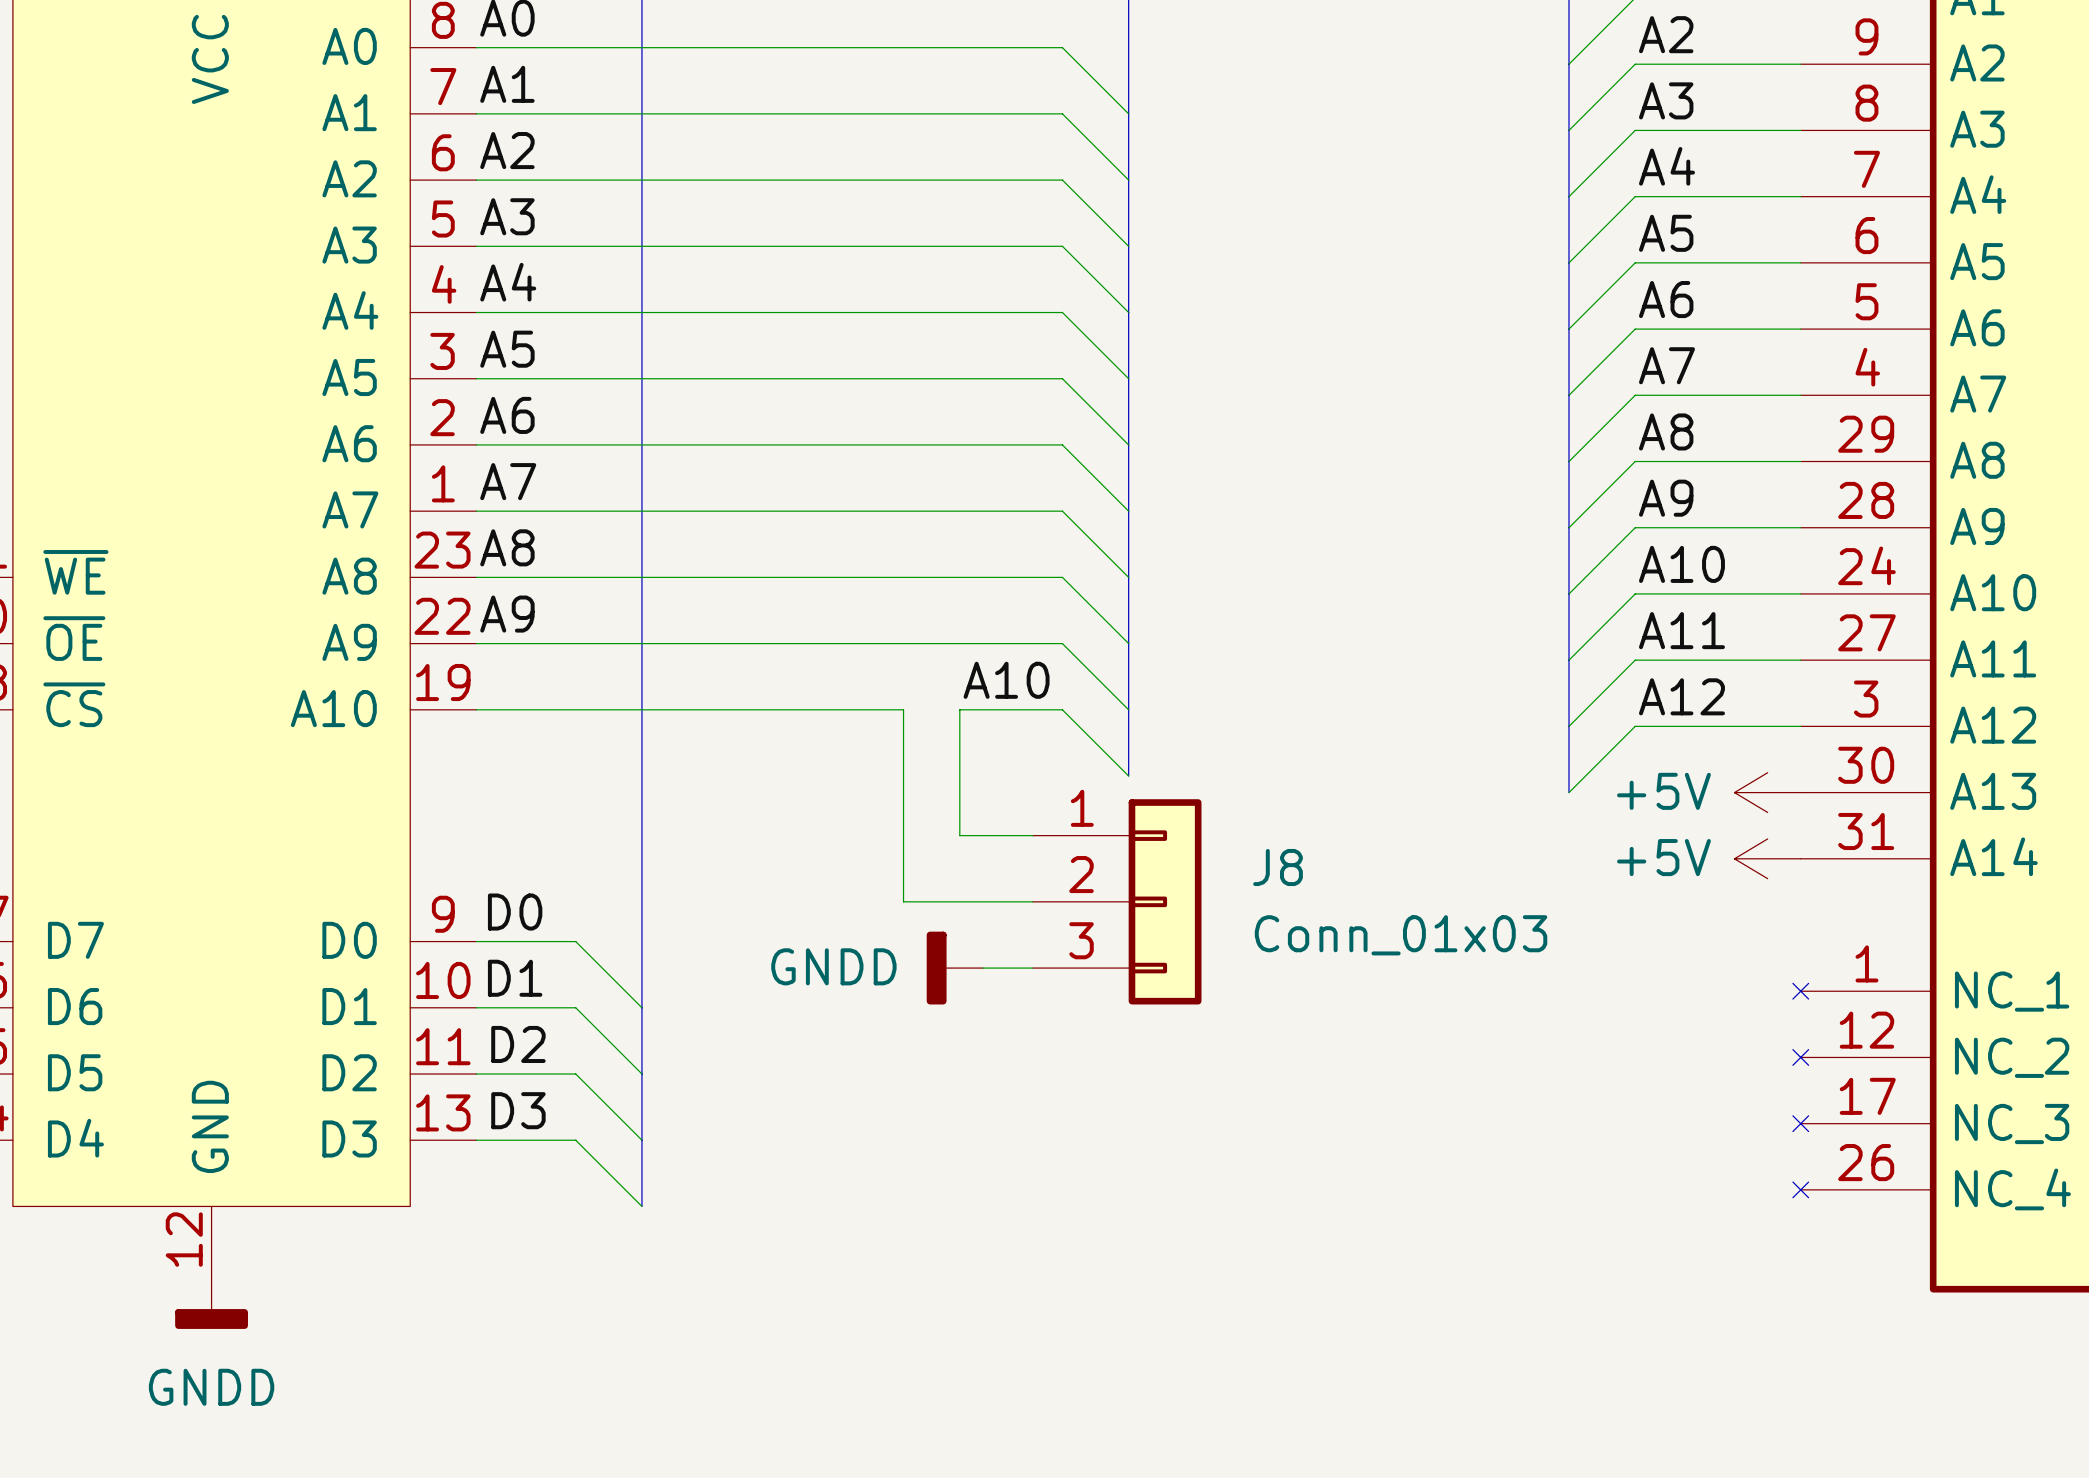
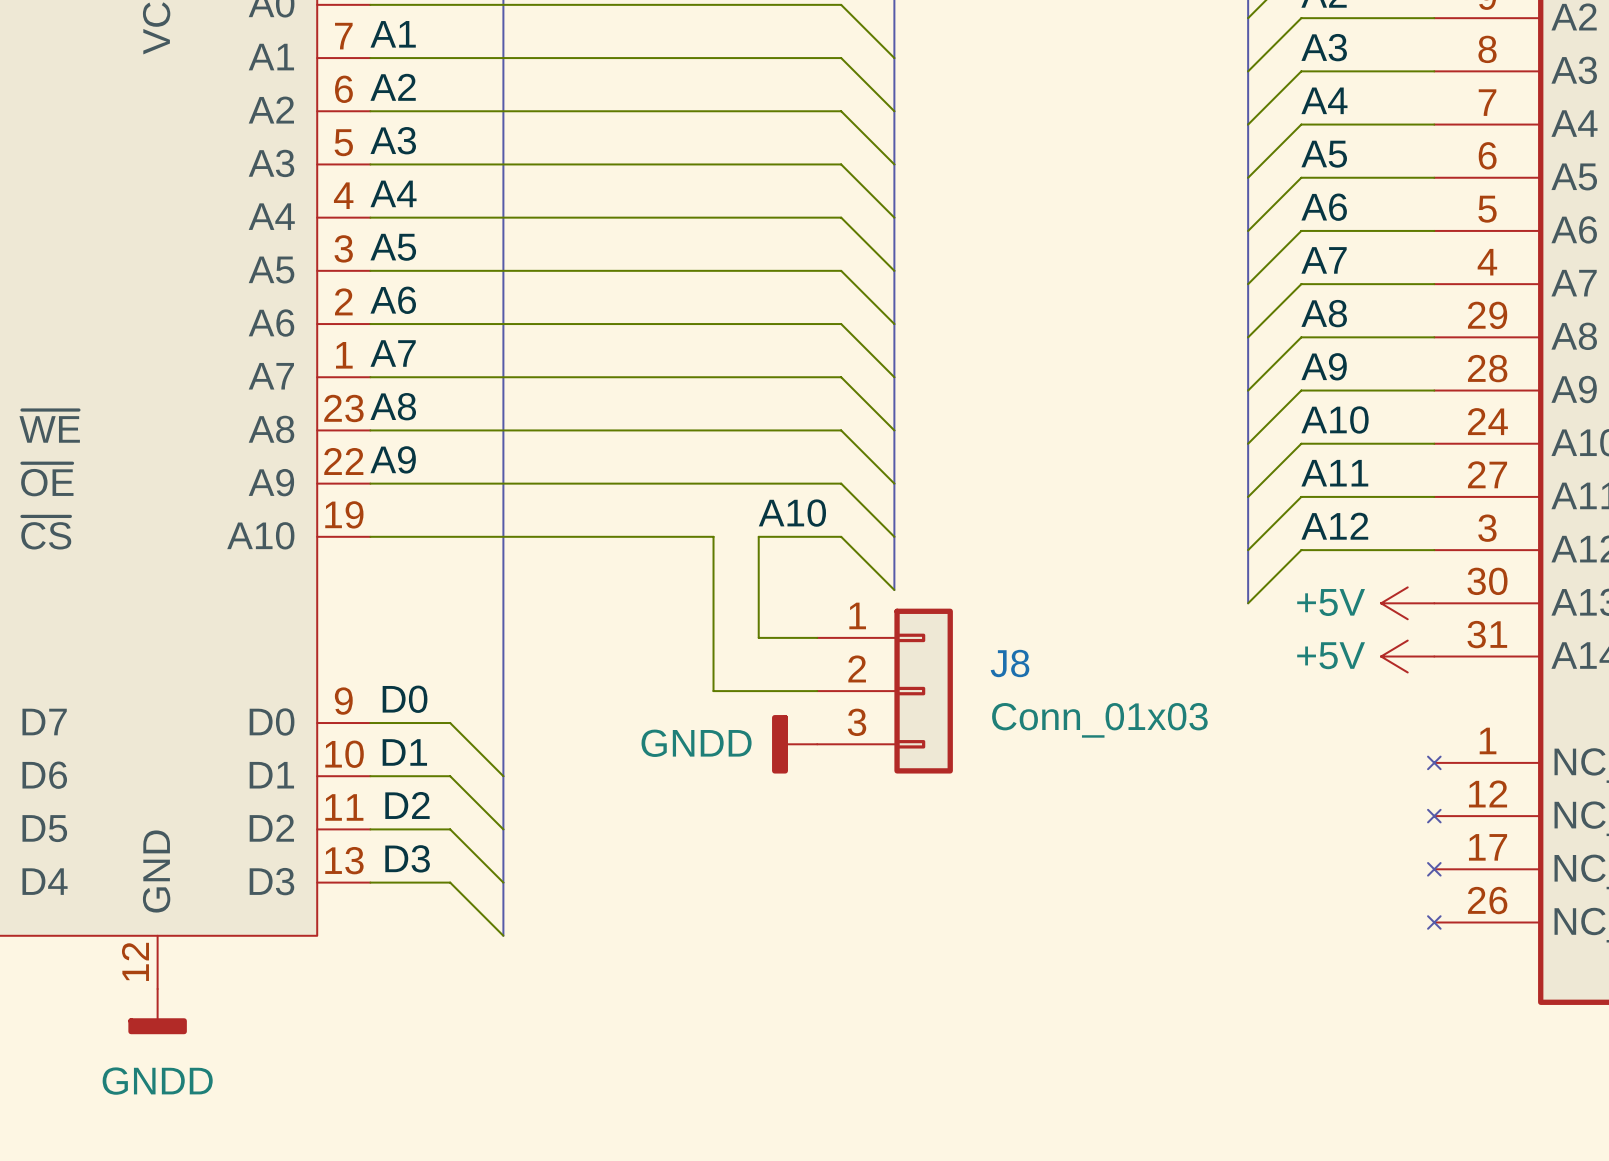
power symbol position: GNDD (954, 968) -> GNDD (794, 744)

